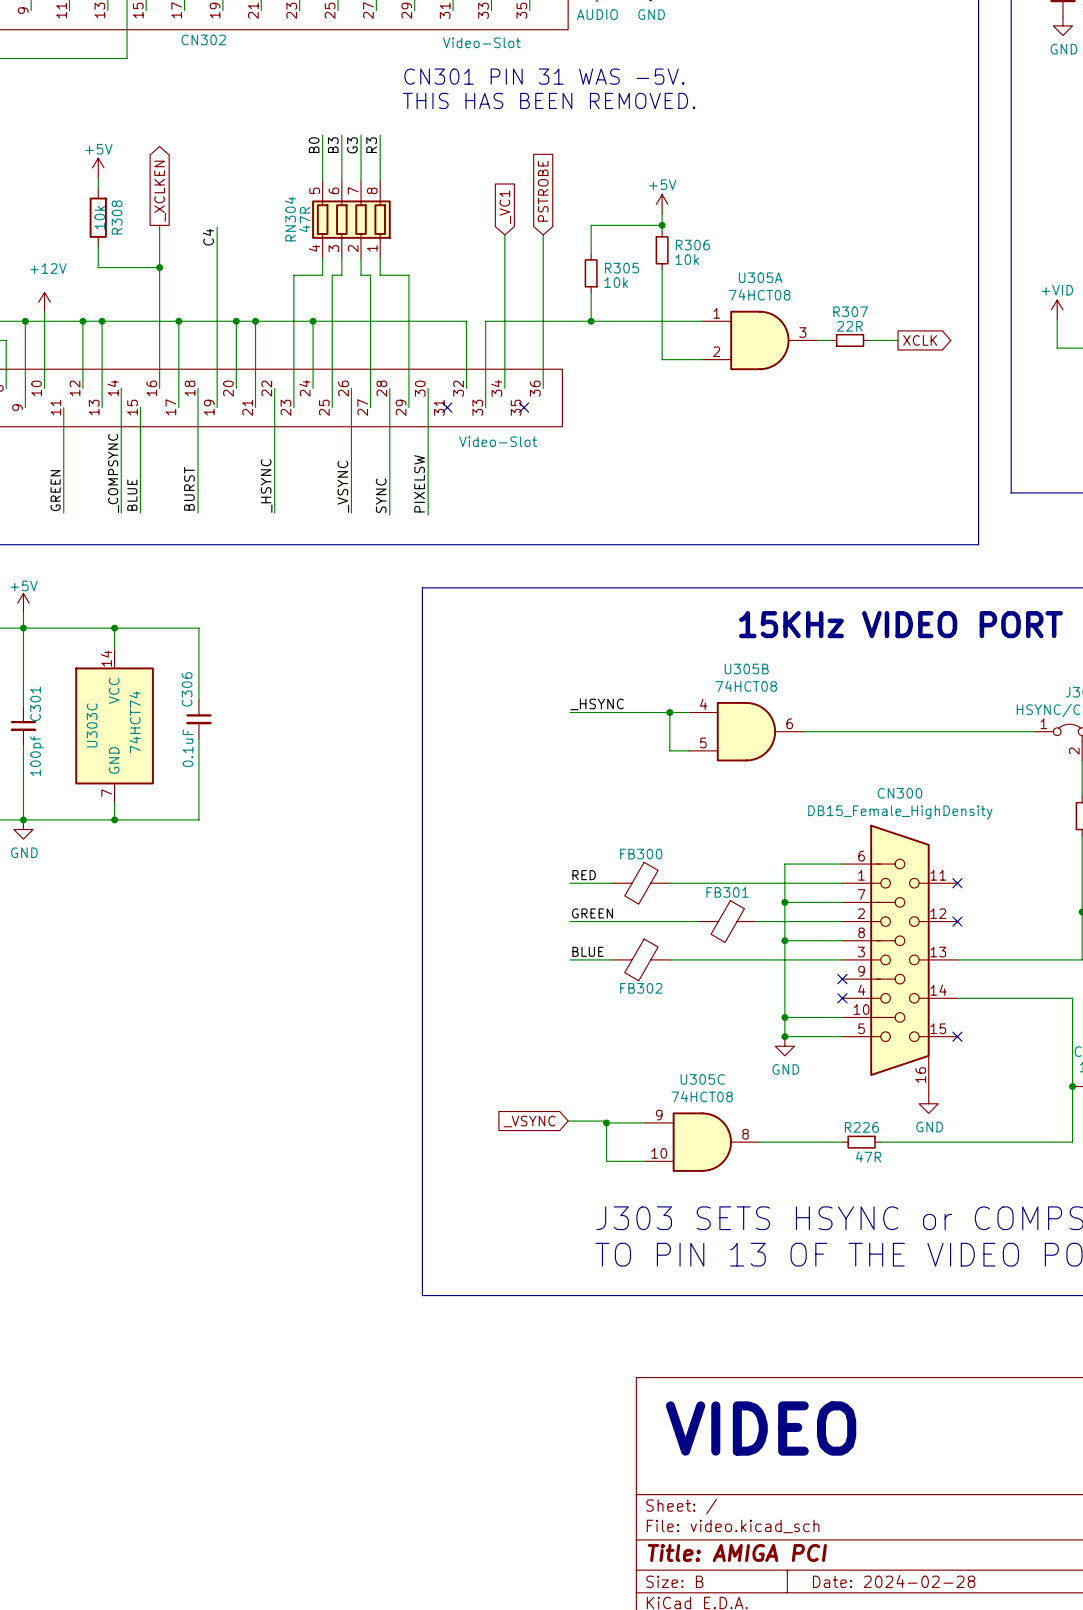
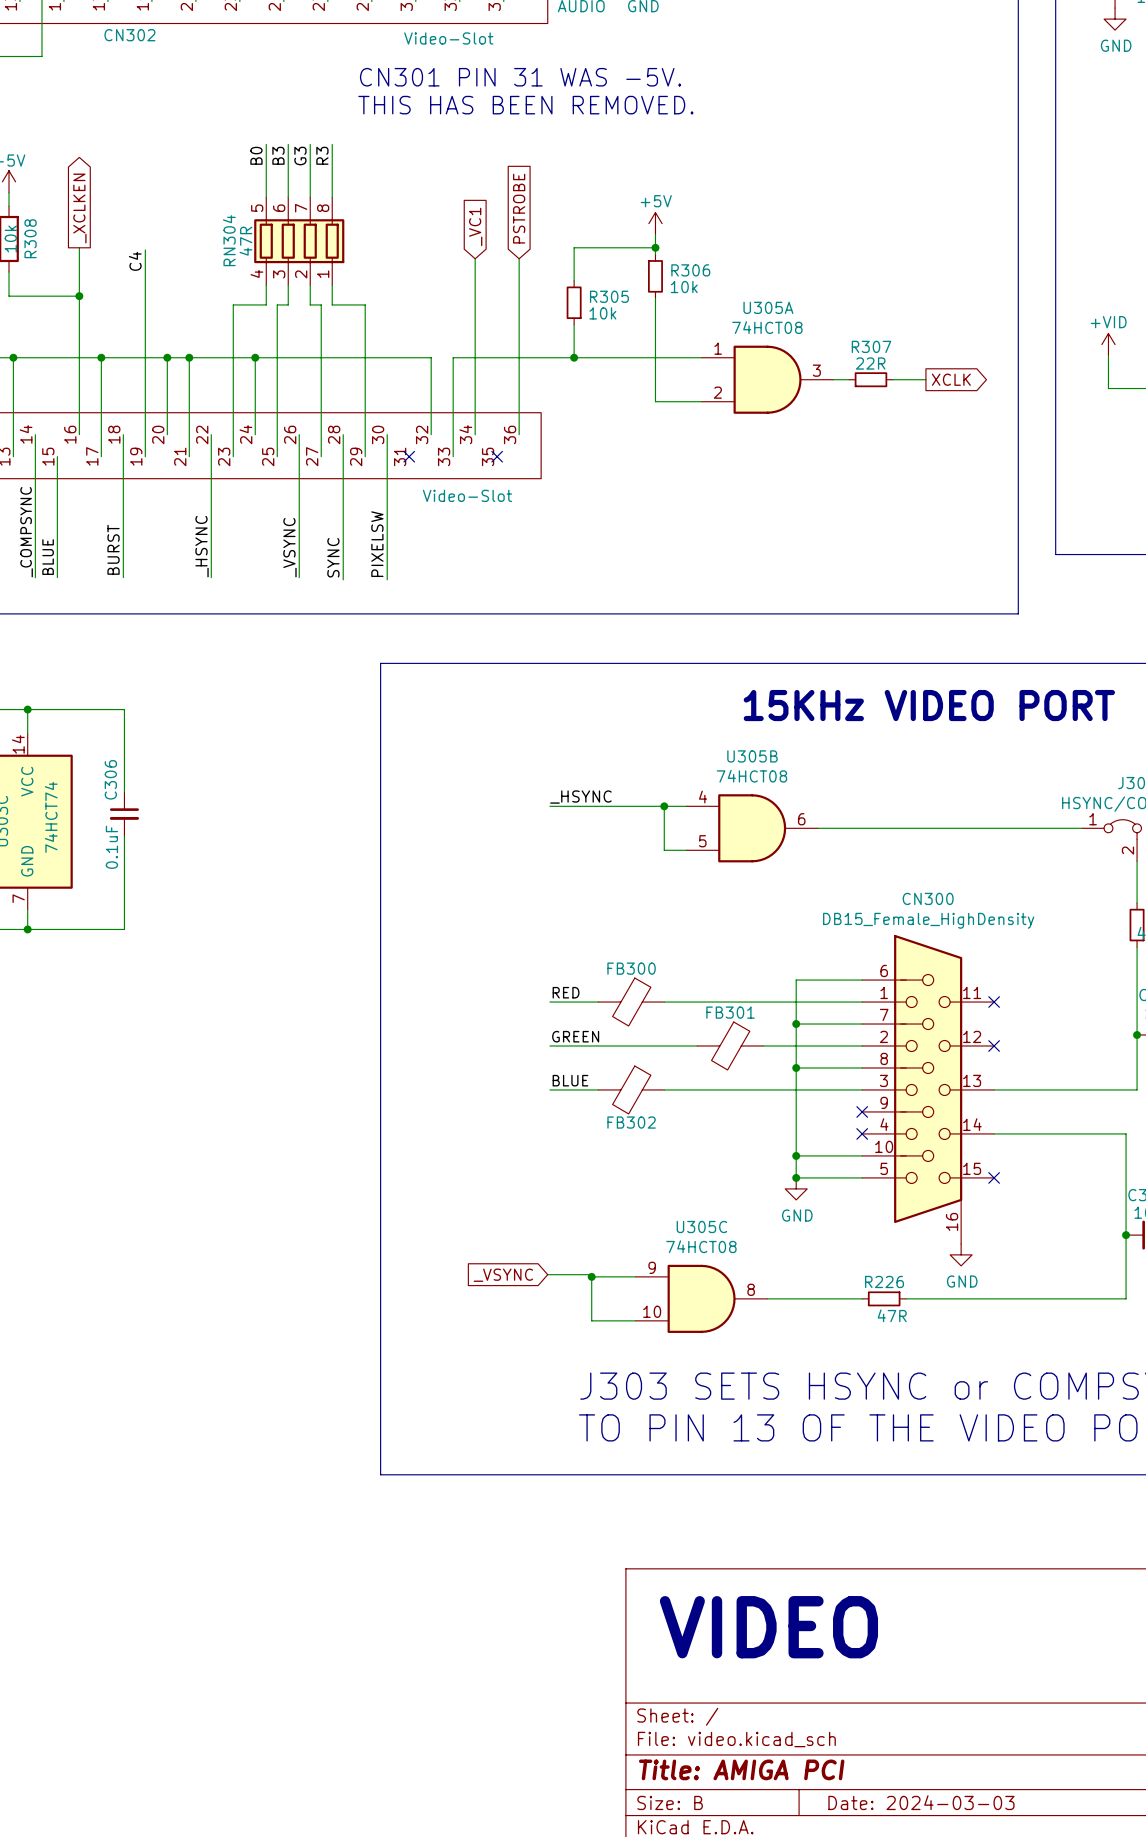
title block: Date: 2024-02-28 (894, 1581) -> Date: 2024-03-03 (921, 1802)

